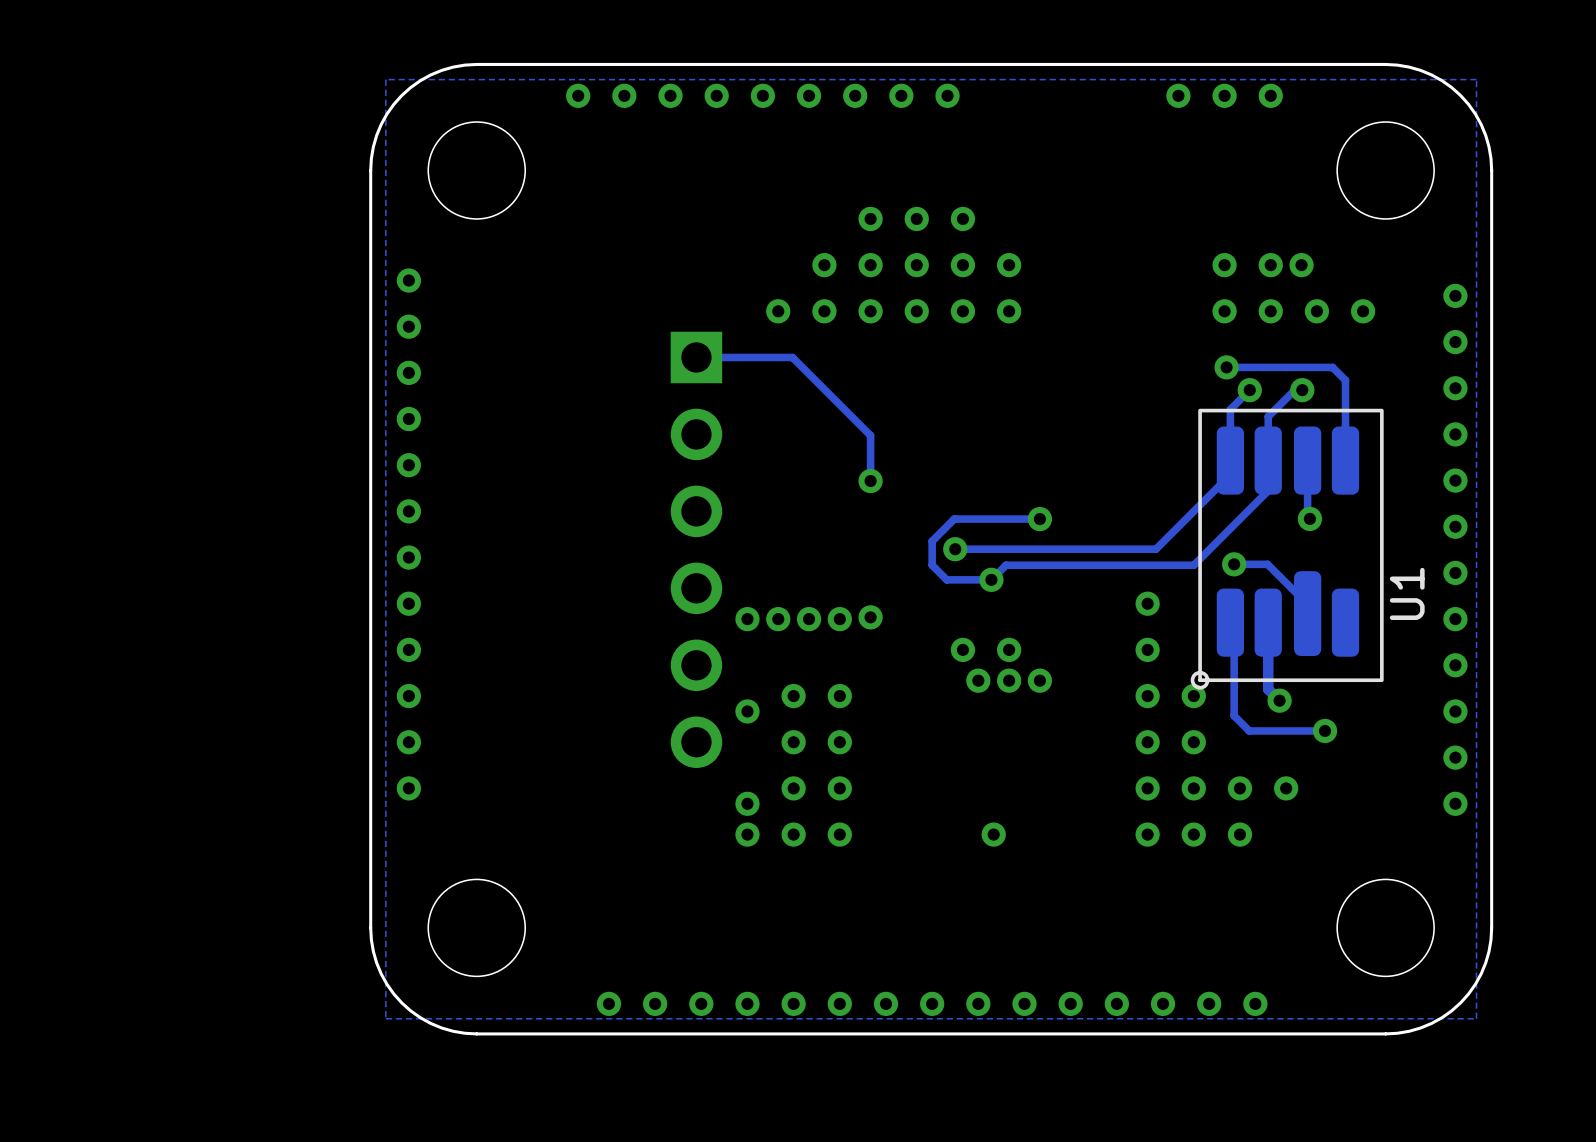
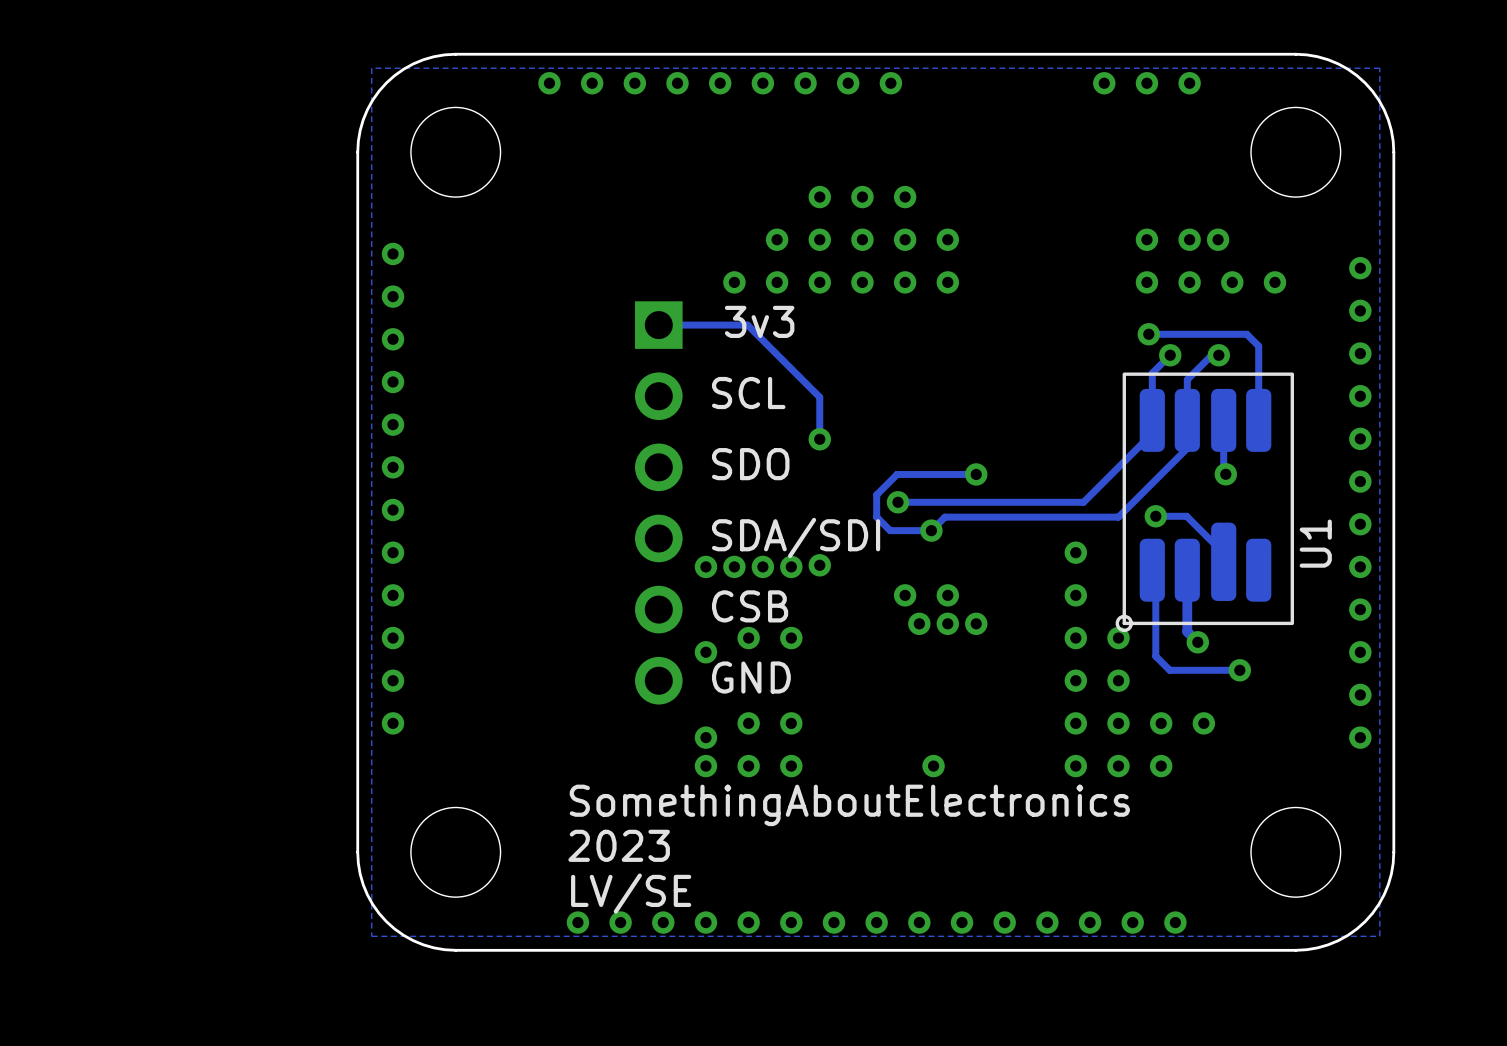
text: none -> 3v3 (759, 321)
text: none -> SCL (748, 393)
text: none -> SDO (750, 464)
text: none -> SDA/SDI (796, 537)
text: none -> CSB (750, 606)
text: none -> GND (751, 677)
via: (793, 742) -> none
via: (839, 742) -> none
text: none -> SomethingAboutElectronics (849, 805)
text: none -> 2023 (619, 845)
text: none -> LV/SE (631, 893)

